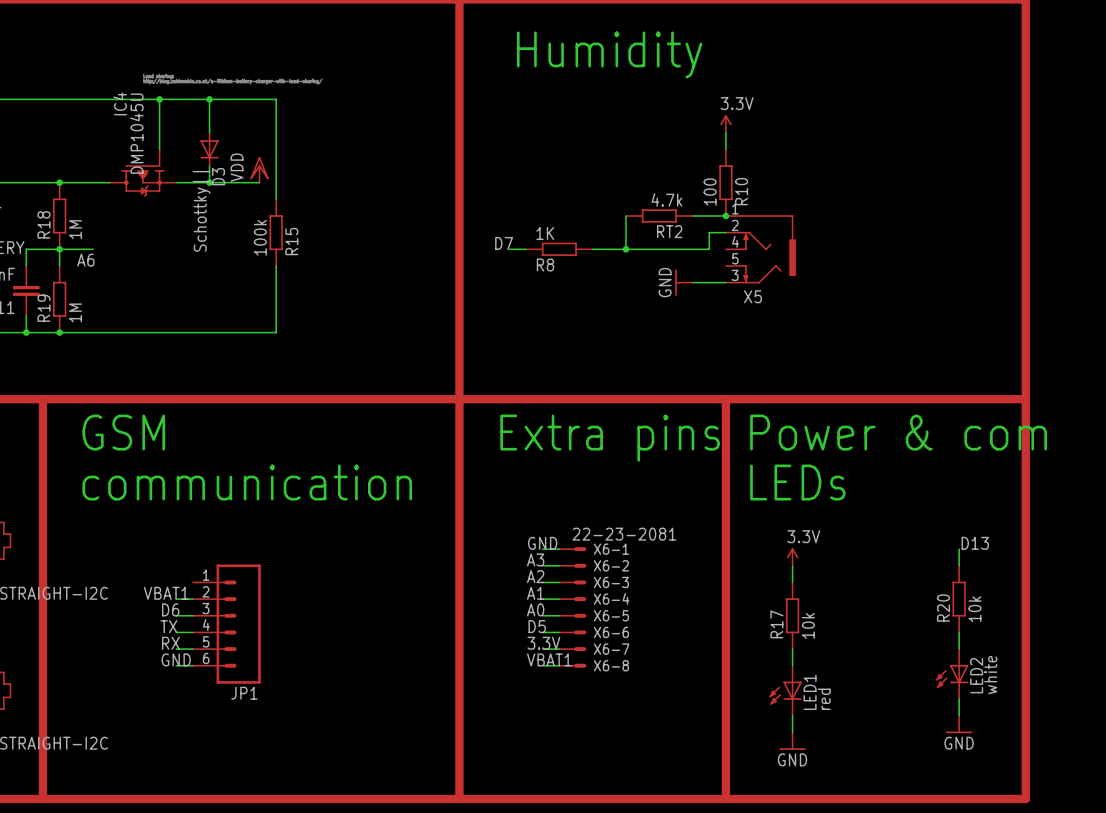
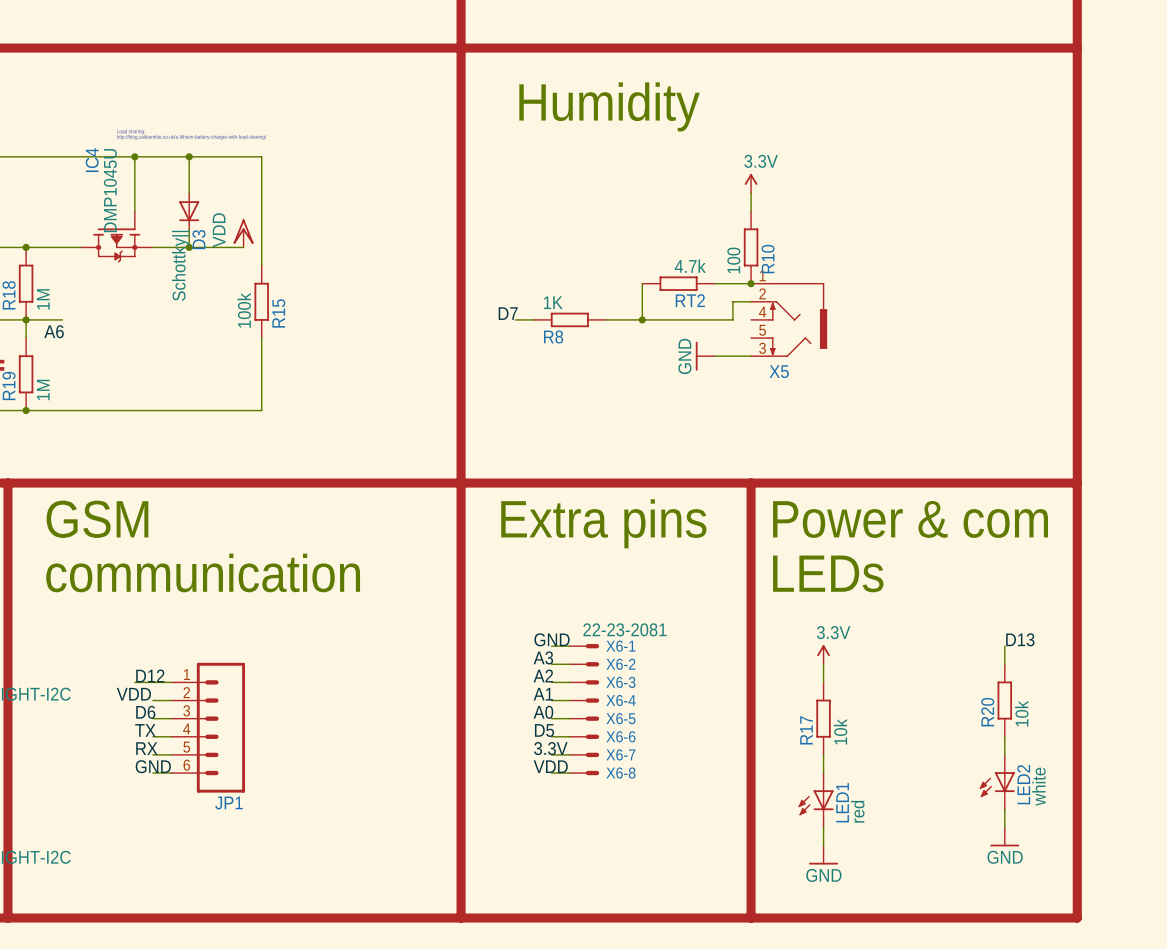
label: none -> D12 (150, 675)
wire: none -> (134, 682) (171, 682)
label: VBAT1 (166, 593) -> VDD (133, 694)
label: VBAT1 (549, 659) -> VDD (550, 766)

